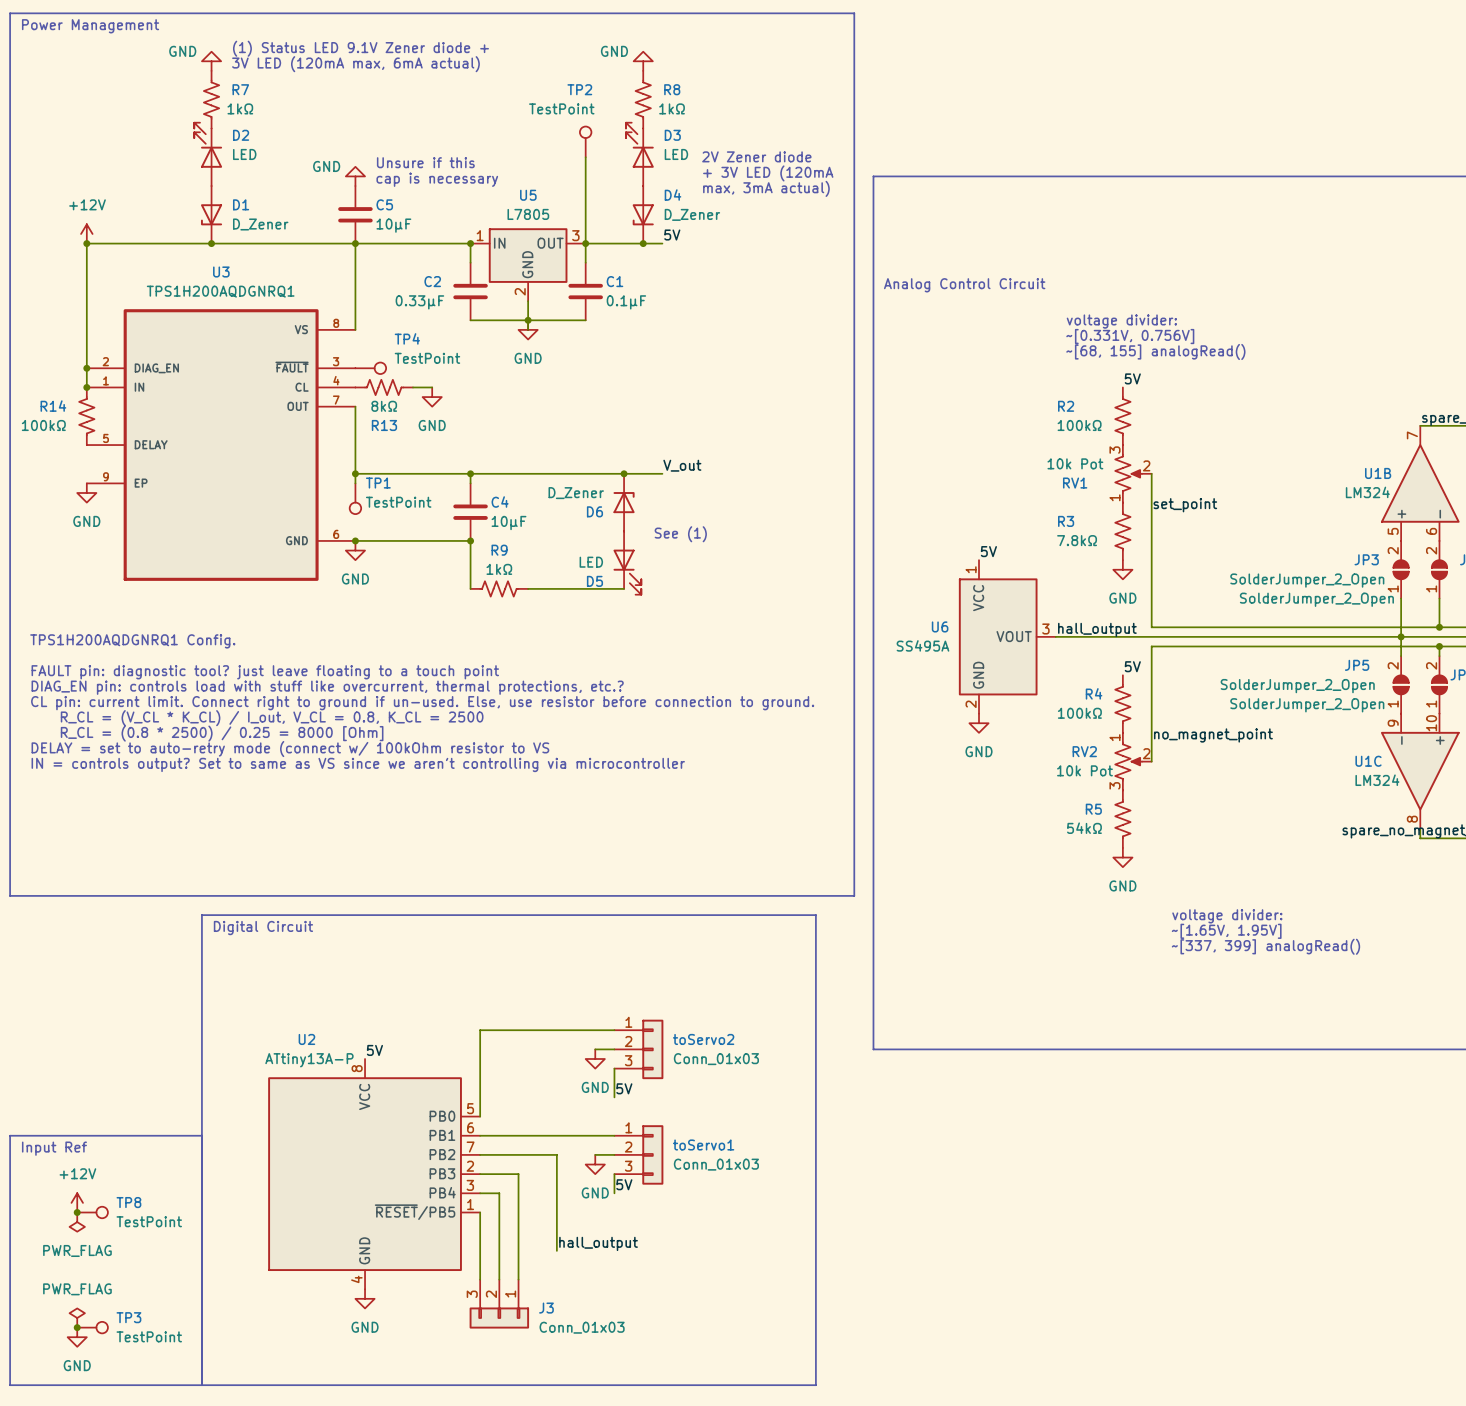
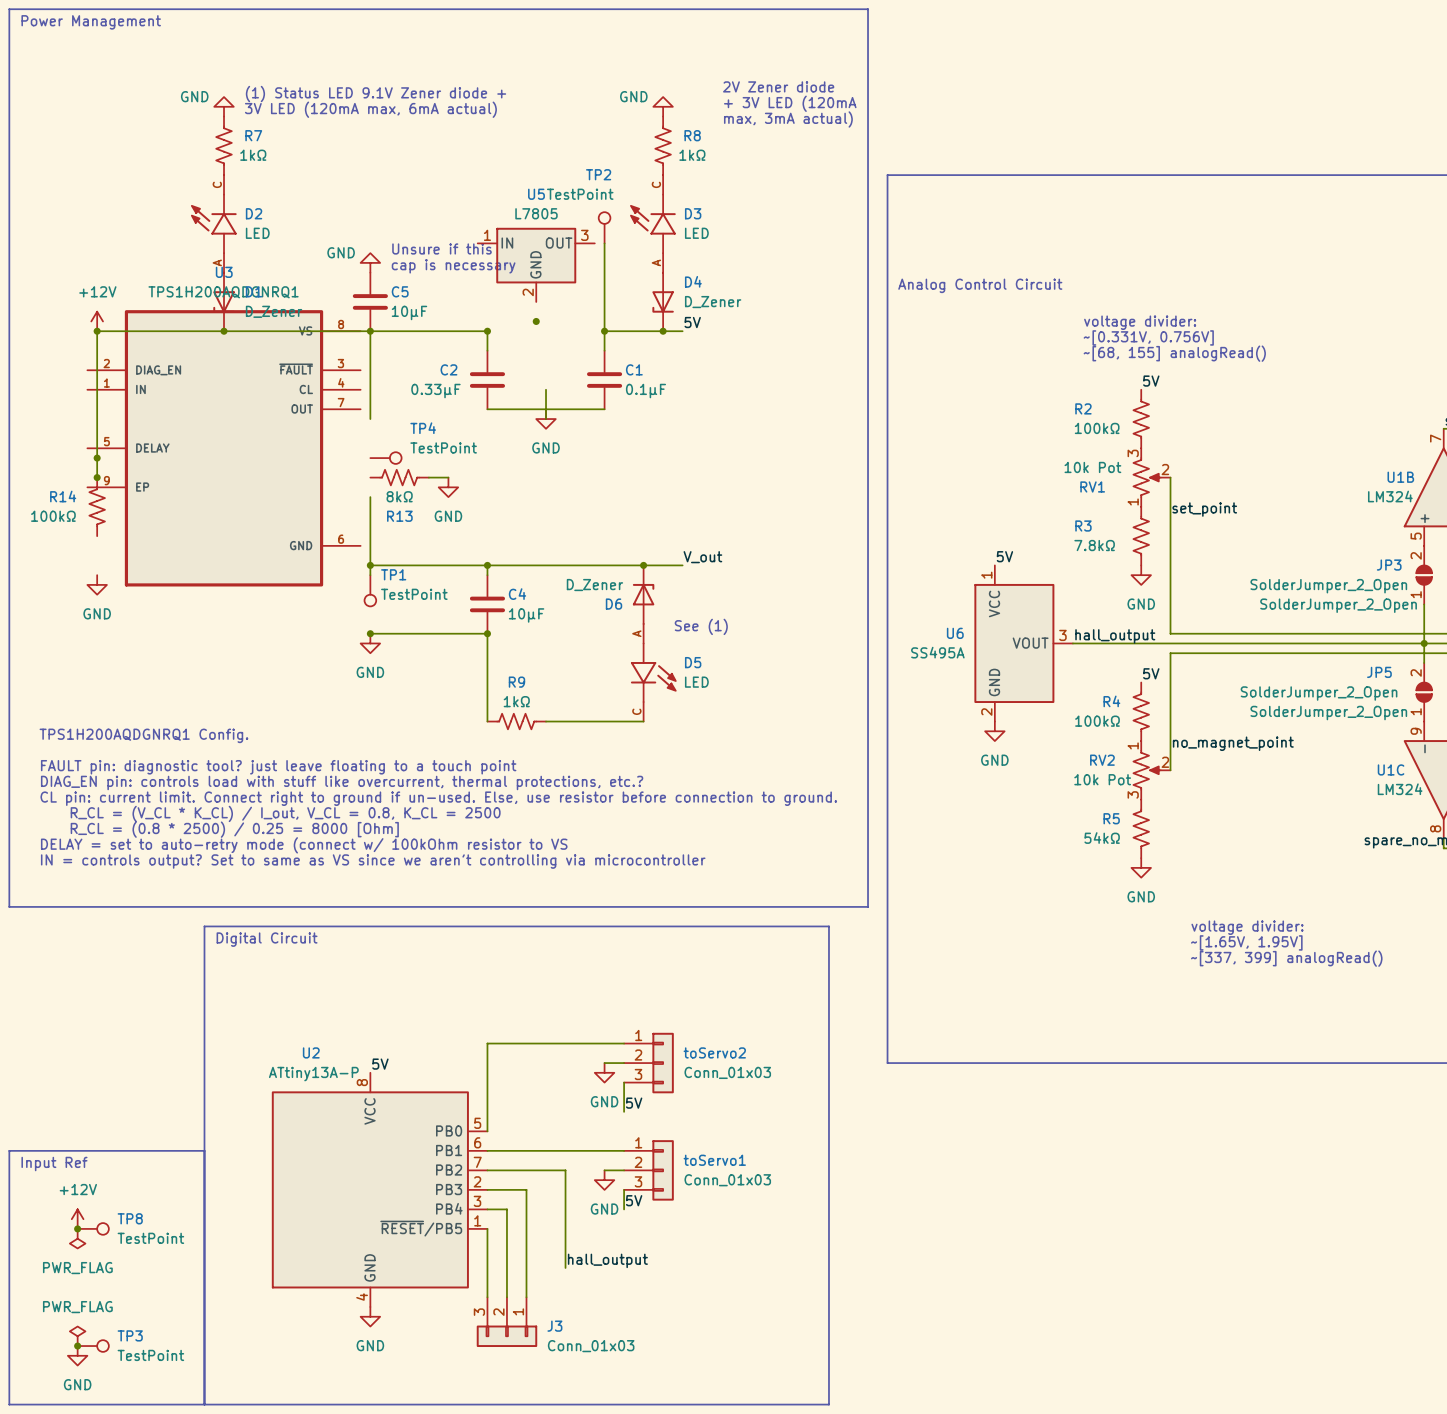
text position: (1) Status LED 9.1V Zener diode + (360, 48) -> (1) Status LED 9.1V Zener diode + (376, 94)
power symbol position: GND (211, 61) -> GND (224, 106)
power symbol position: GND (643, 61) -> GND (663, 106)
text position: 3V LED (120mA max, 6mA actual) (355, 64) -> 3V LED (120mA max, 6mA actual) (370, 109)
R7 position: (211, 99) -> (224, 145)
R8 position: (643, 99) -> (663, 145)
D2 symbol: [194, 122, 223, 187] -> [191, 175, 237, 273]
D3 symbol: [625, 122, 654, 187] -> [630, 175, 676, 273]
TP2 position: (585, 141) -> (604, 227)
text position: 2V Zener diode (756, 156) -> 2V Zener diode (778, 86)
wire: (585, 157) (585, 262) -> (604, 243) (604, 350)
text position: Unsure if this (425, 162) -> Unsure if this (442, 248)
text position: + 3V LED (120mA (768, 173) -> + 3V LED (120mA (790, 103)
power symbol: GND (355, 176) -> none
text position: cap is necessary (437, 179) -> cap is necessary (453, 266)
text position: max, 3mA actual) (766, 188) -> max, 3mA actual) (788, 119)
D1 position: (211, 214) -> (224, 301)
C5 position: (355, 214) -> (370, 301)
D4 position: (643, 214) -> (663, 301)
power symbol position: +12V (86, 233) -> +12V (97, 321)
label position: 5V (672, 235) -> 5V (692, 322)
junction: (86, 243) -> none
junction: (211, 243) -> none
wire: (355, 243) (355, 329) -> (370, 331) (370, 419)
junction: (355, 243) -> none
junction: (470, 243) -> none
wire: (585, 243) (662, 243) -> (604, 331) (682, 331)
junction: (585, 243) -> none
junction: (643, 243) -> none
power symbol: none -> GND (370, 262)
wire: (470, 262) (470, 243) (86, 243) (86, 387) -> (487, 350) (487, 331) (97, 331) (97, 477)
C2 position: (470, 291) -> (487, 380)
C1 position: (585, 291) -> (604, 380)
wire: (528, 301) (528, 329) -> (546, 389) (546, 419)
wire: (470, 320) (585, 320) -> (487, 409) (604, 409)
junction: none -> (97, 331)
junction: none -> (224, 331)
junction: none -> (370, 331)
junction: none -> (487, 331)
power symbol: GND (528, 329) -> none
junction: none -> (604, 331)
junction: none -> (663, 331)
junction: (86, 368) -> none
TP4 position: (370, 368) -> (385, 458)
junction: (86, 387) -> none
R13 position: (384, 387) -> (399, 477)
wire: (413, 387) (432, 387) -> none
power symbol: GND (432, 397) -> none
wire: (355, 406) (355, 483) -> (370, 497) (370, 575)
R14 position: (86, 416) -> (97, 506)
power symbol: none -> GND (546, 419)
junction: none -> (97, 458)
label position: V_out (682, 465) -> V_out (702, 557)
junction: none -> (97, 477)
junction: (355, 473) -> none
wire: (441, 473) (662, 473) -> none
wire: (470, 473) (470, 483) -> (487, 565) (487, 575)
junction: (470, 473) -> none
junction: (624, 473) -> none
power symbol: none -> GND (448, 487)
power symbol position: GND (86, 493) -> GND (97, 584)
TP1 position: (355, 498) -> (370, 590)
D6 position: (624, 502) -> (643, 594)
C4 position: (470, 512) -> (487, 604)
D5 symbol: [613, 531, 642, 595] -> [630, 623, 677, 722]
text position: See (1) (680, 534) -> See (1) (701, 626)
wire: (355, 540) (470, 540) (470, 588) -> none
junction position: (355, 540) -> (370, 565)
junction position: (470, 540) -> (487, 565)
power symbol: GND (355, 550) -> none
wire: none -> (370, 565) (682, 565)
junction: none -> (643, 565)
D5 value position: LED (591, 562) -> LED (696, 682)
D5 name position: D5 (594, 581) -> D5 (693, 662)
R9 position: (499, 588) -> (516, 721)
wire: (528, 588) (624, 588) -> (546, 721) (643, 721)
wire: none -> (370, 633) (487, 633) (487, 721)
junction: none -> (370, 633)
junction: none -> (487, 633)
power symbol: none -> GND (370, 643)
text position: TPS1H200AQDGNRQ1 Config. (132, 641) -> TPS1H200AQDGNRQ1 Config. (143, 735)
text position: FAULT pin: diagnostic tool? just leave floating to a touch point (265, 672) -> FAULT pin: diagnostic tool? just leave floating to a touch point (278, 767)
text position: DIAG_EN pin: controls load with stuff like overcurrent, thermal protections, etc.? (327, 687) -> DIAG_EN pin: controls load with stuff like overcurrent, thermal protections, etc.? (342, 782)
text position: CL pin: current limit. Connect right to ground if un-used. Else, use resistor before connection to ground. (422, 703) -> CL pin: current limit. Connect right to ground if un-used. Else, use resistor before connection to ground. (438, 798)
text position: R_CL = (V_CL * K_CL) / I_out, V_CL = 0.8, K_CL = 2500 (272, 718) -> R_CL = (V_CL * K_CL) / I_out, V_CL = 0.8, K_CL = 2500 (285, 813)
text position: R_CL = (0.8 * 2500) / 0.25 = 8000 [Ohm] (222, 733) -> R_CL = (0.8 * 2500) / 0.25 = 8000 [Ohm] (234, 829)
text position: DELAY = set to auto-retry mode (connect w/ 100kOhm resistor to VS (290, 749) -> DELAY = set to auto-retry mode (connect w/ 100kOhm resistor to VS (304, 845)
text position: IN = controls output? Set to same as VS since we aren't controlling via microcontroller (358, 764) -> IN = controls output? Set to same as VS since we aren't controlling via microcontroller (373, 861)

